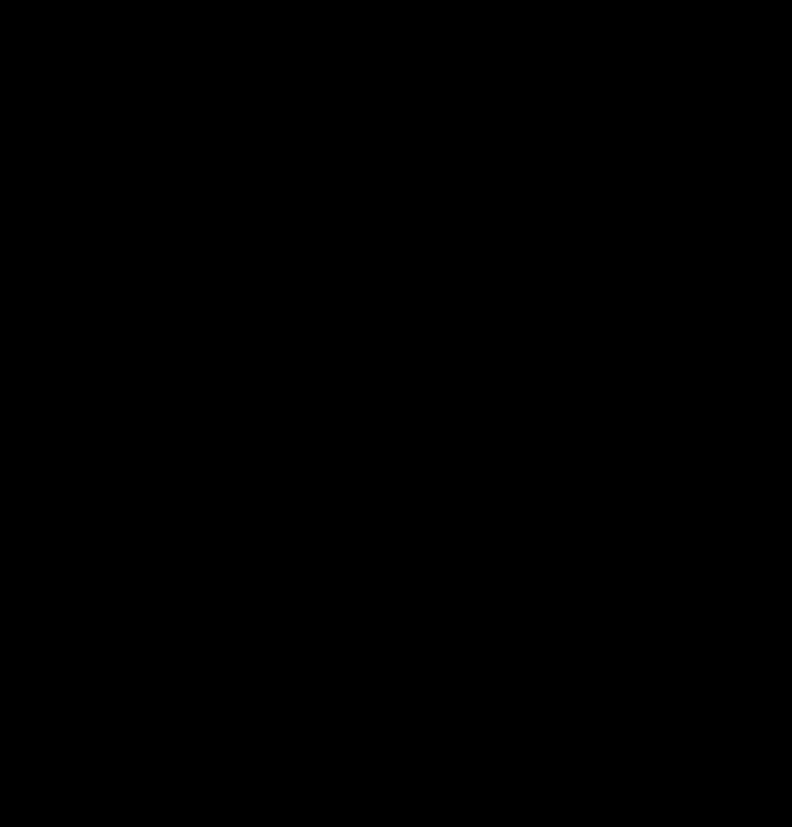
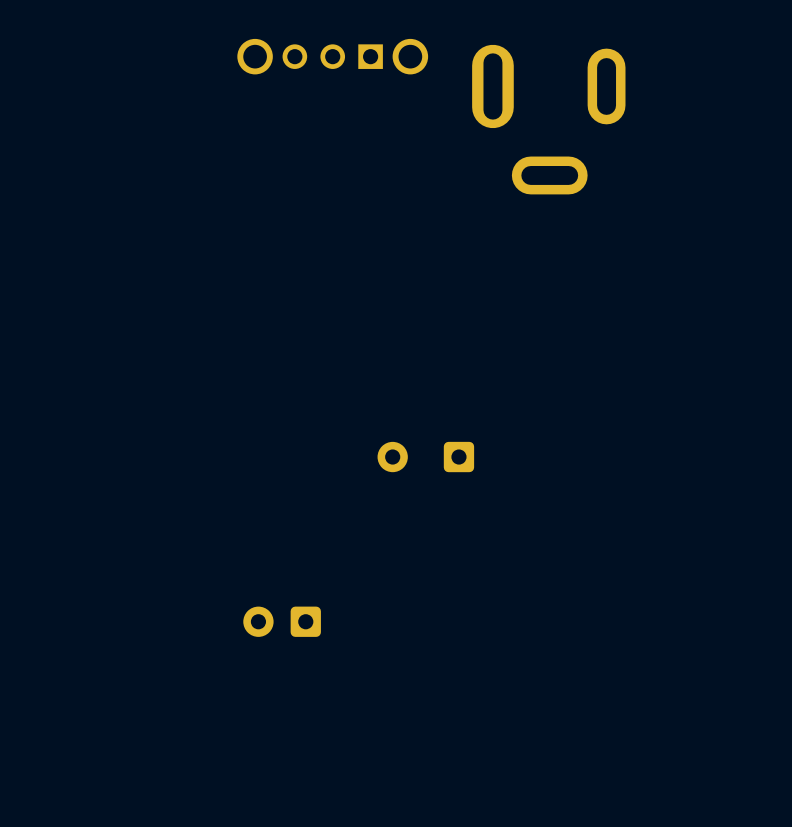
part: none -> (332, 56)
part: none -> (548, 119)
part: none -> (425, 457)
part: none -> (282, 621)

